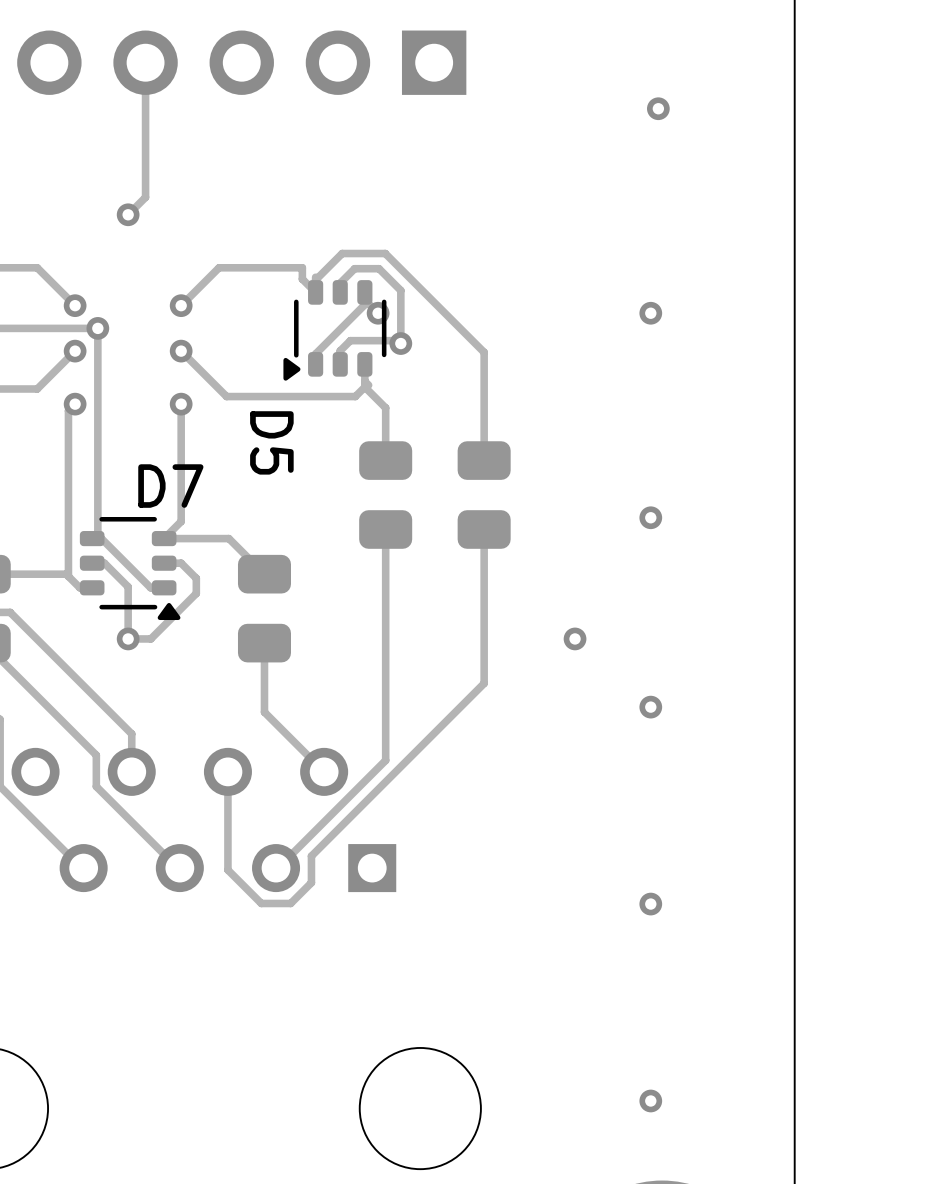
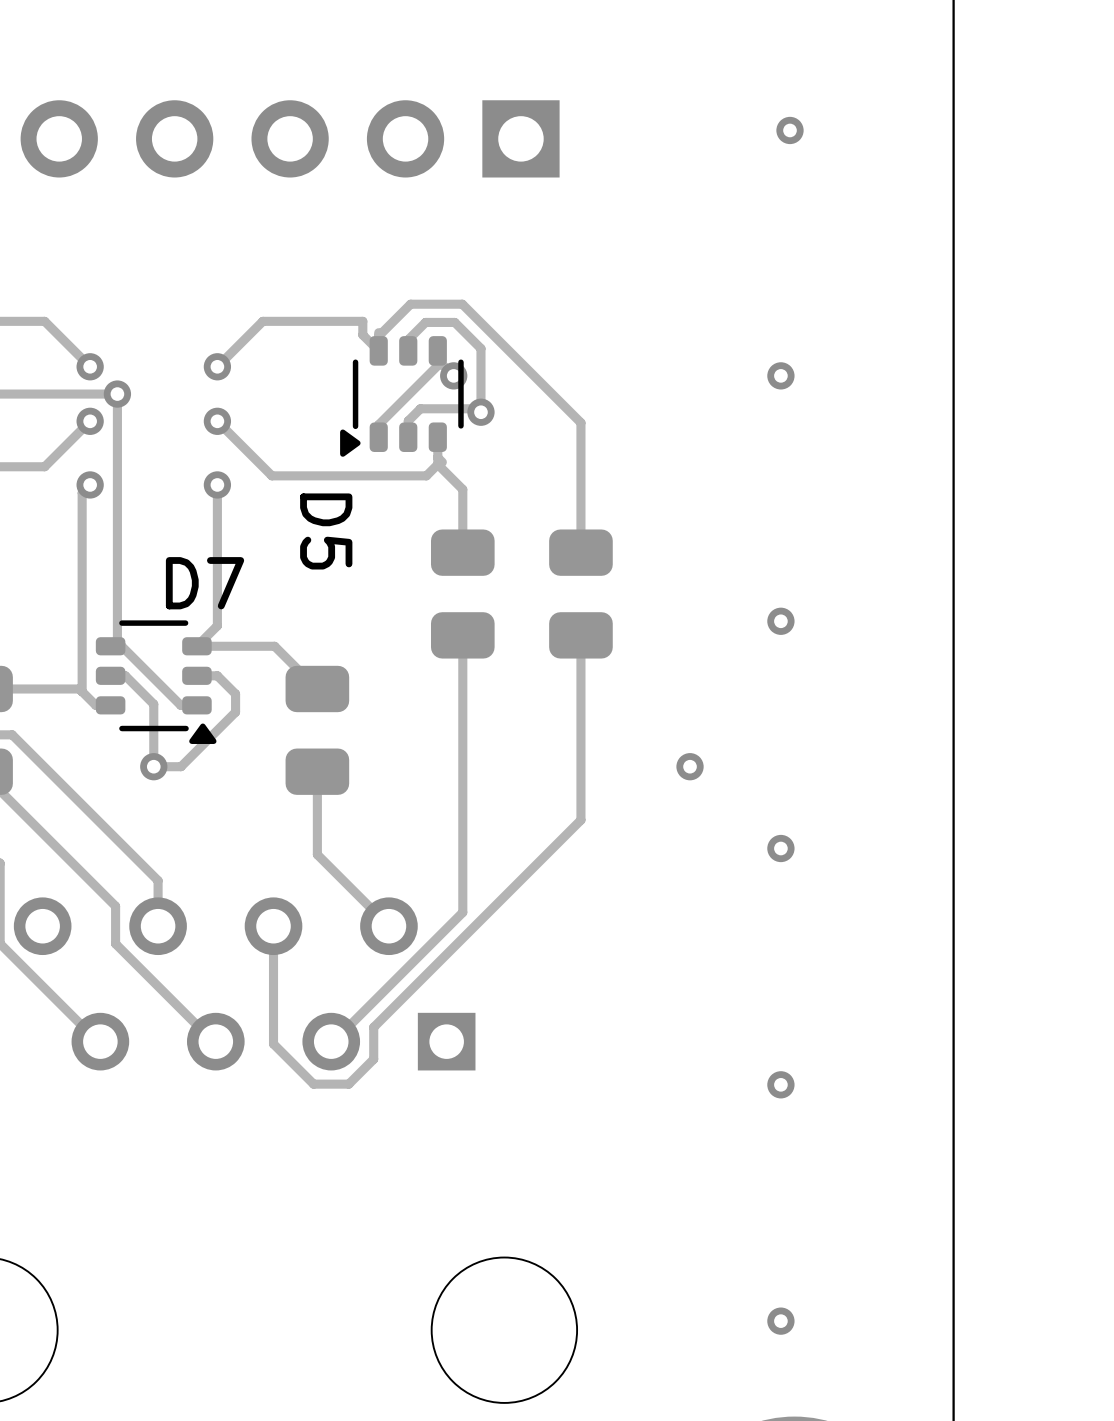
track: (145, 62) (145, 197) (128, 214) -> none
part position: (241, 62) -> (290, 138)
via: (128, 214) -> none

